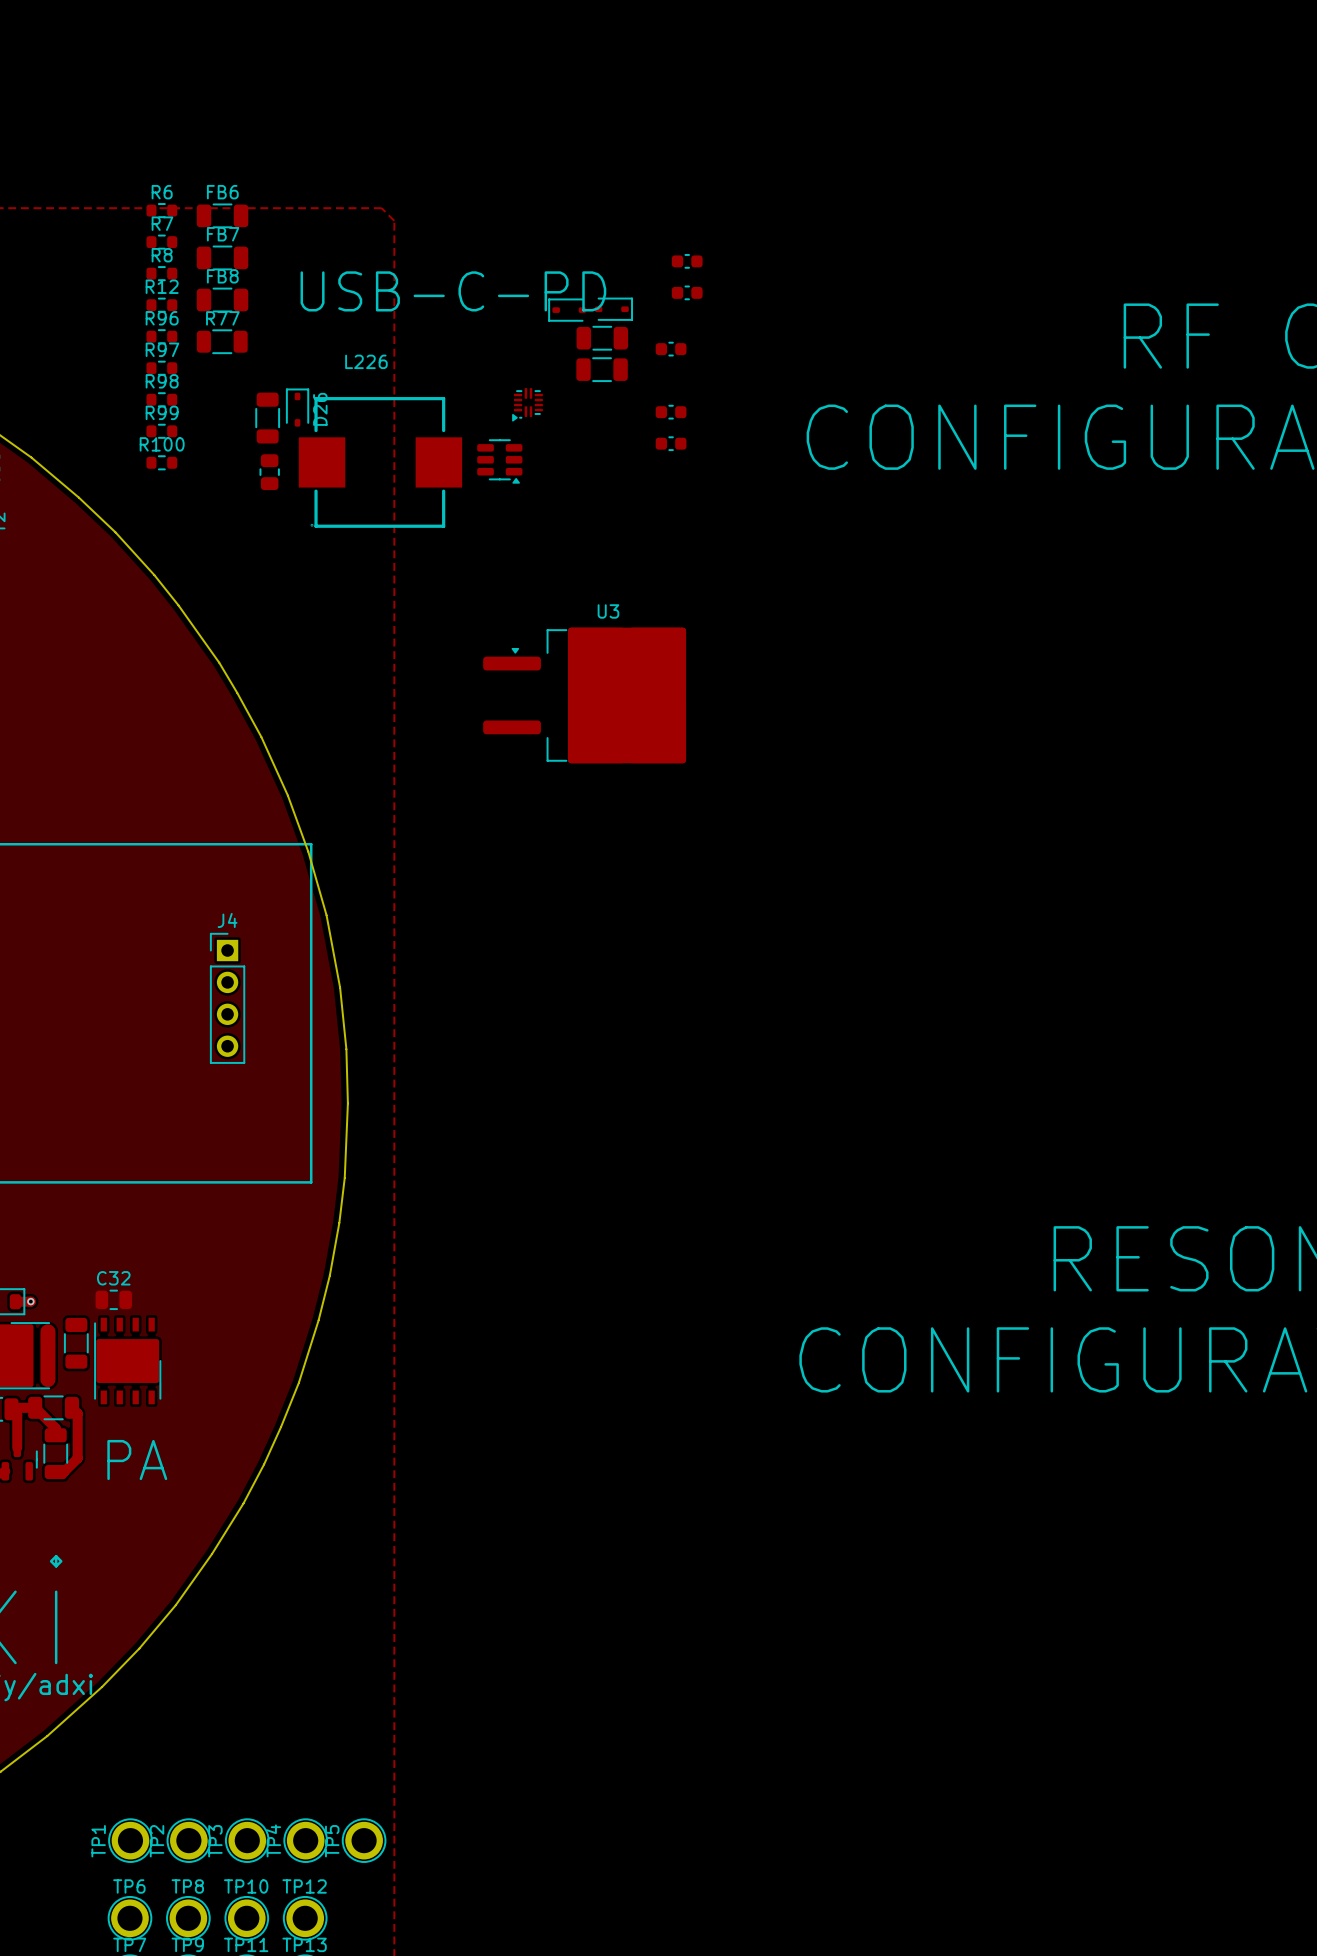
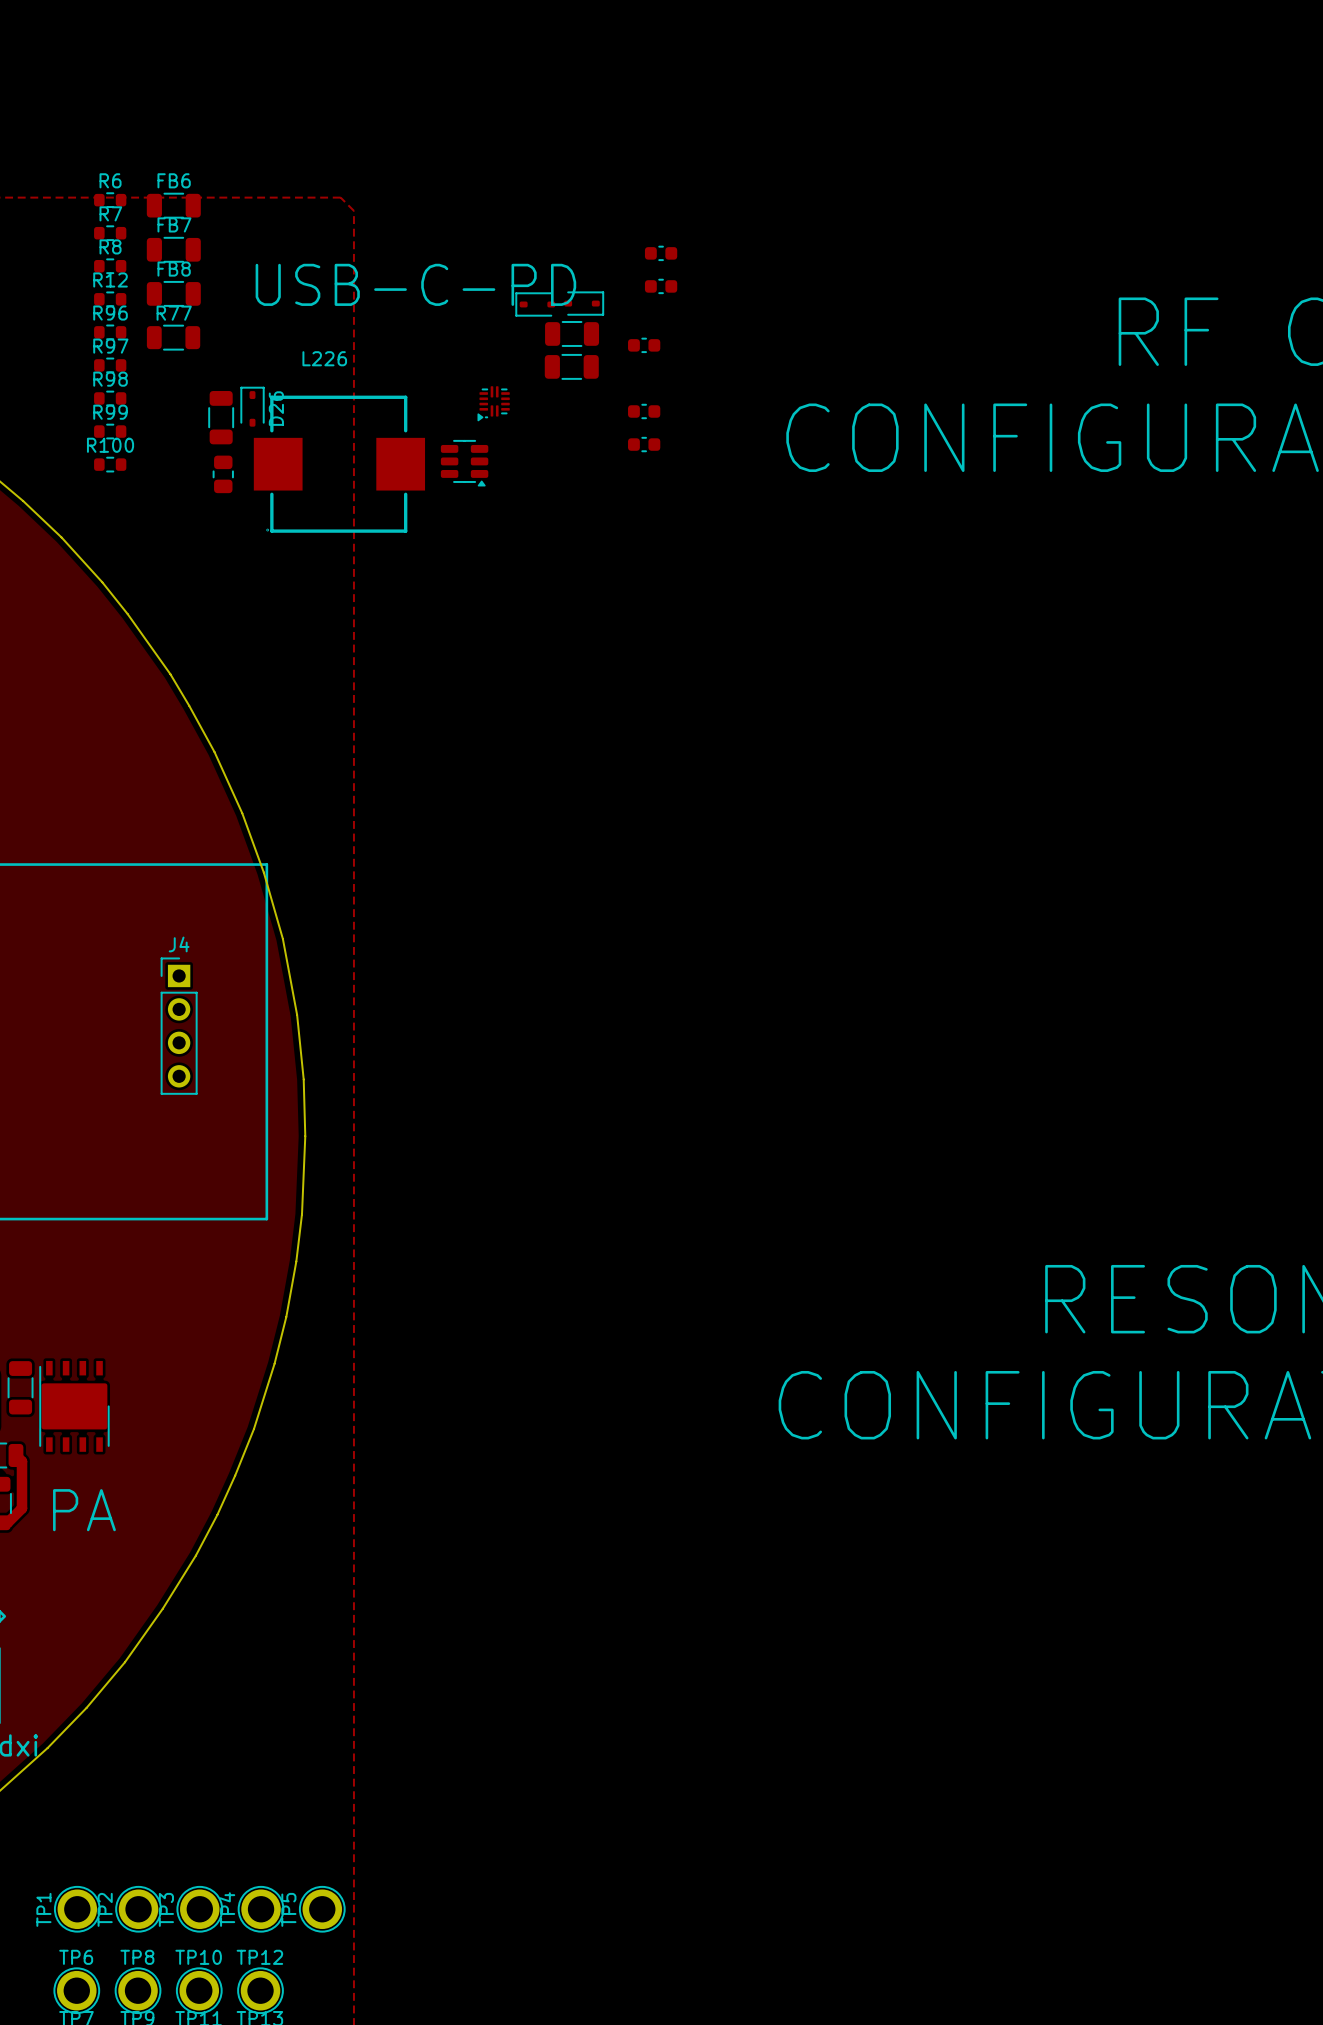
U3: (584, 695) -> none
C32: (113, 1299) -> none

